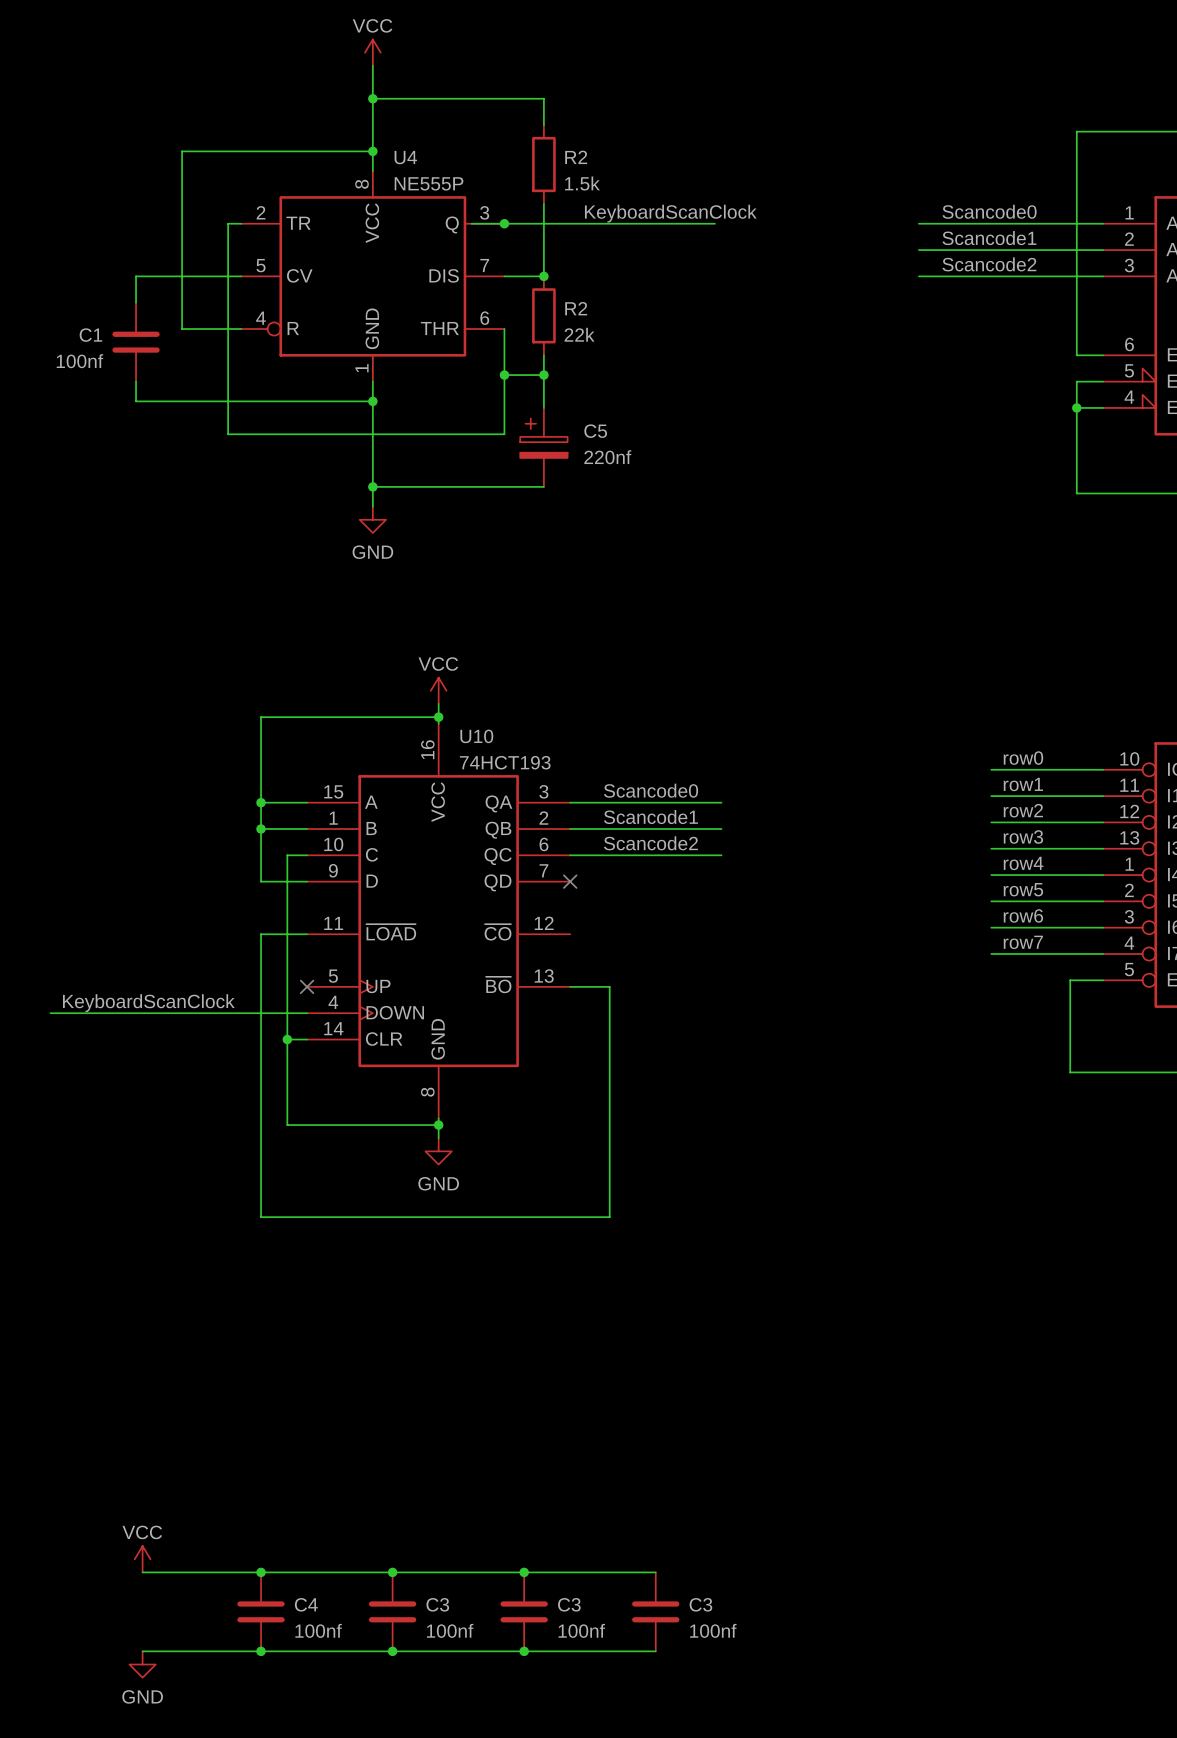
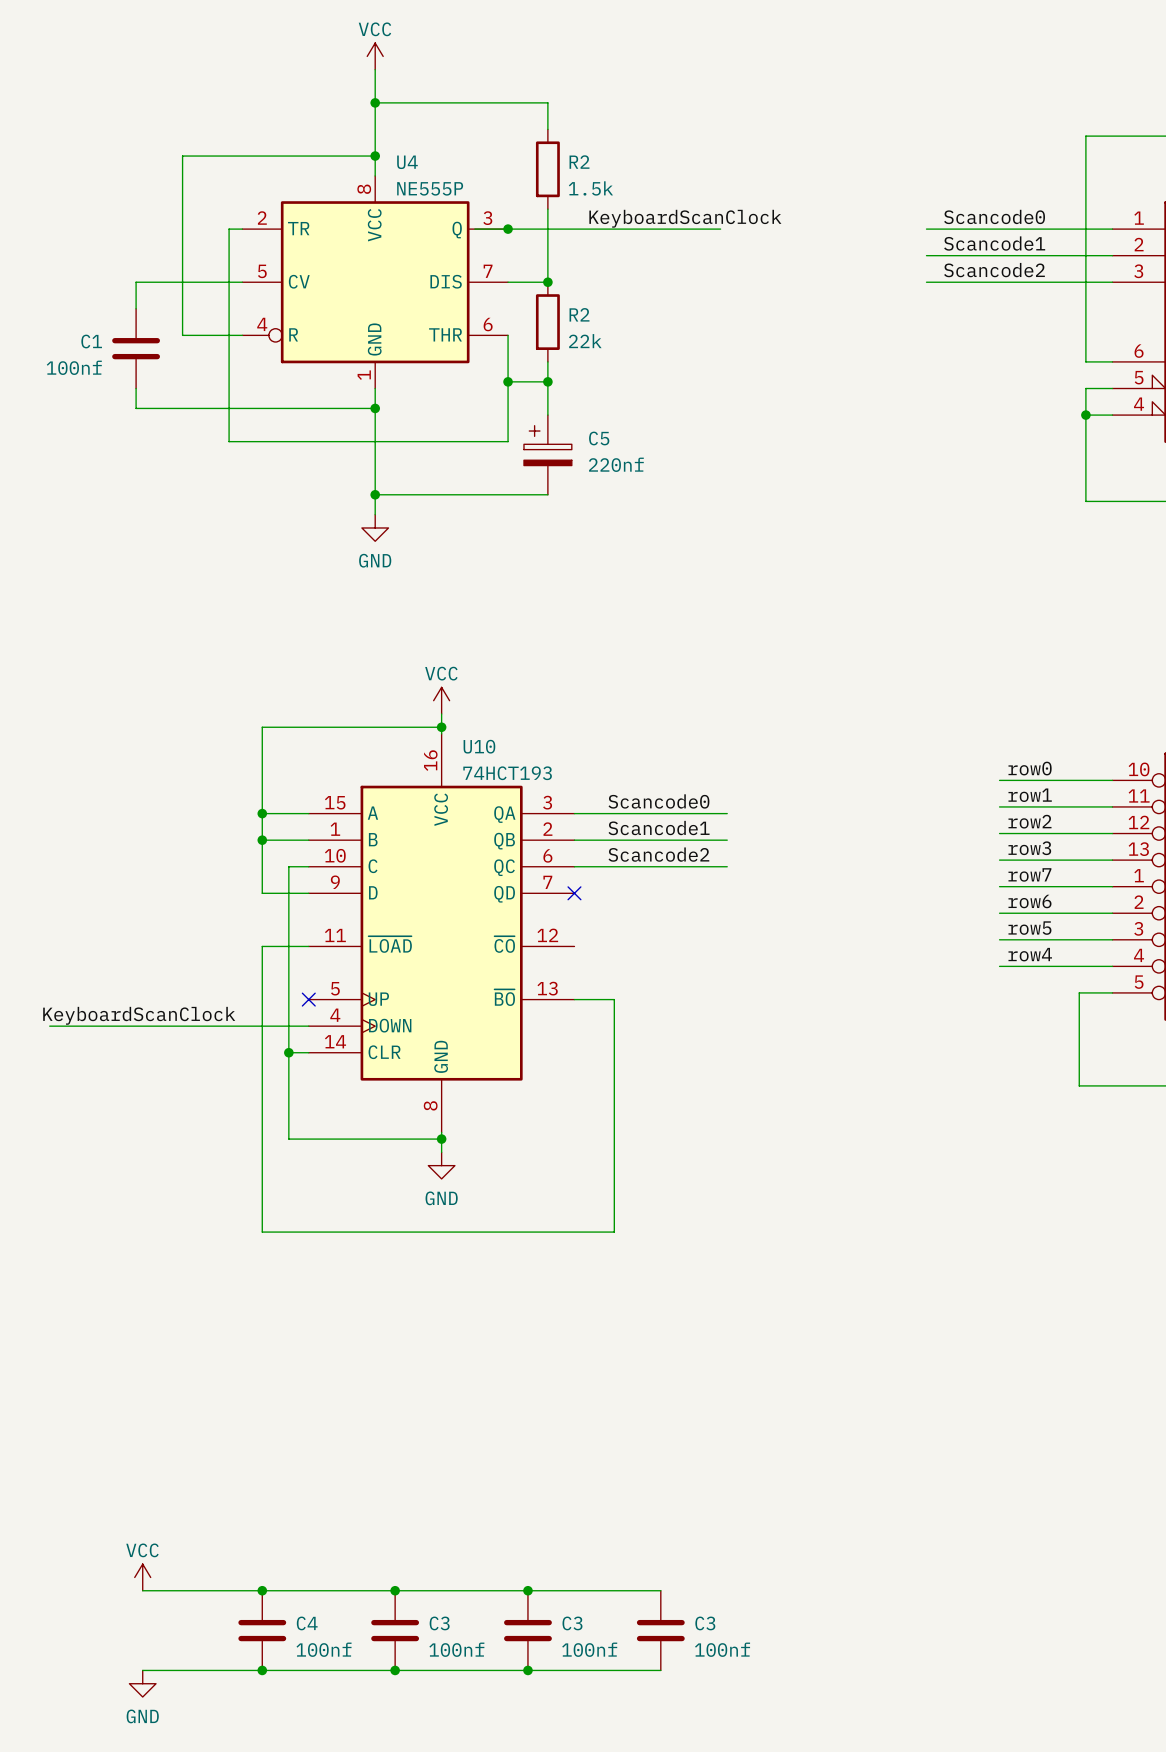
label: row4 (1023, 863) -> row7 (1029, 874)
label: row5 (1023, 889) -> row6 (1029, 901)
label: row6 (1023, 915) -> row5 (1029, 928)
label: row7 (1023, 942) -> row4 (1030, 954)

